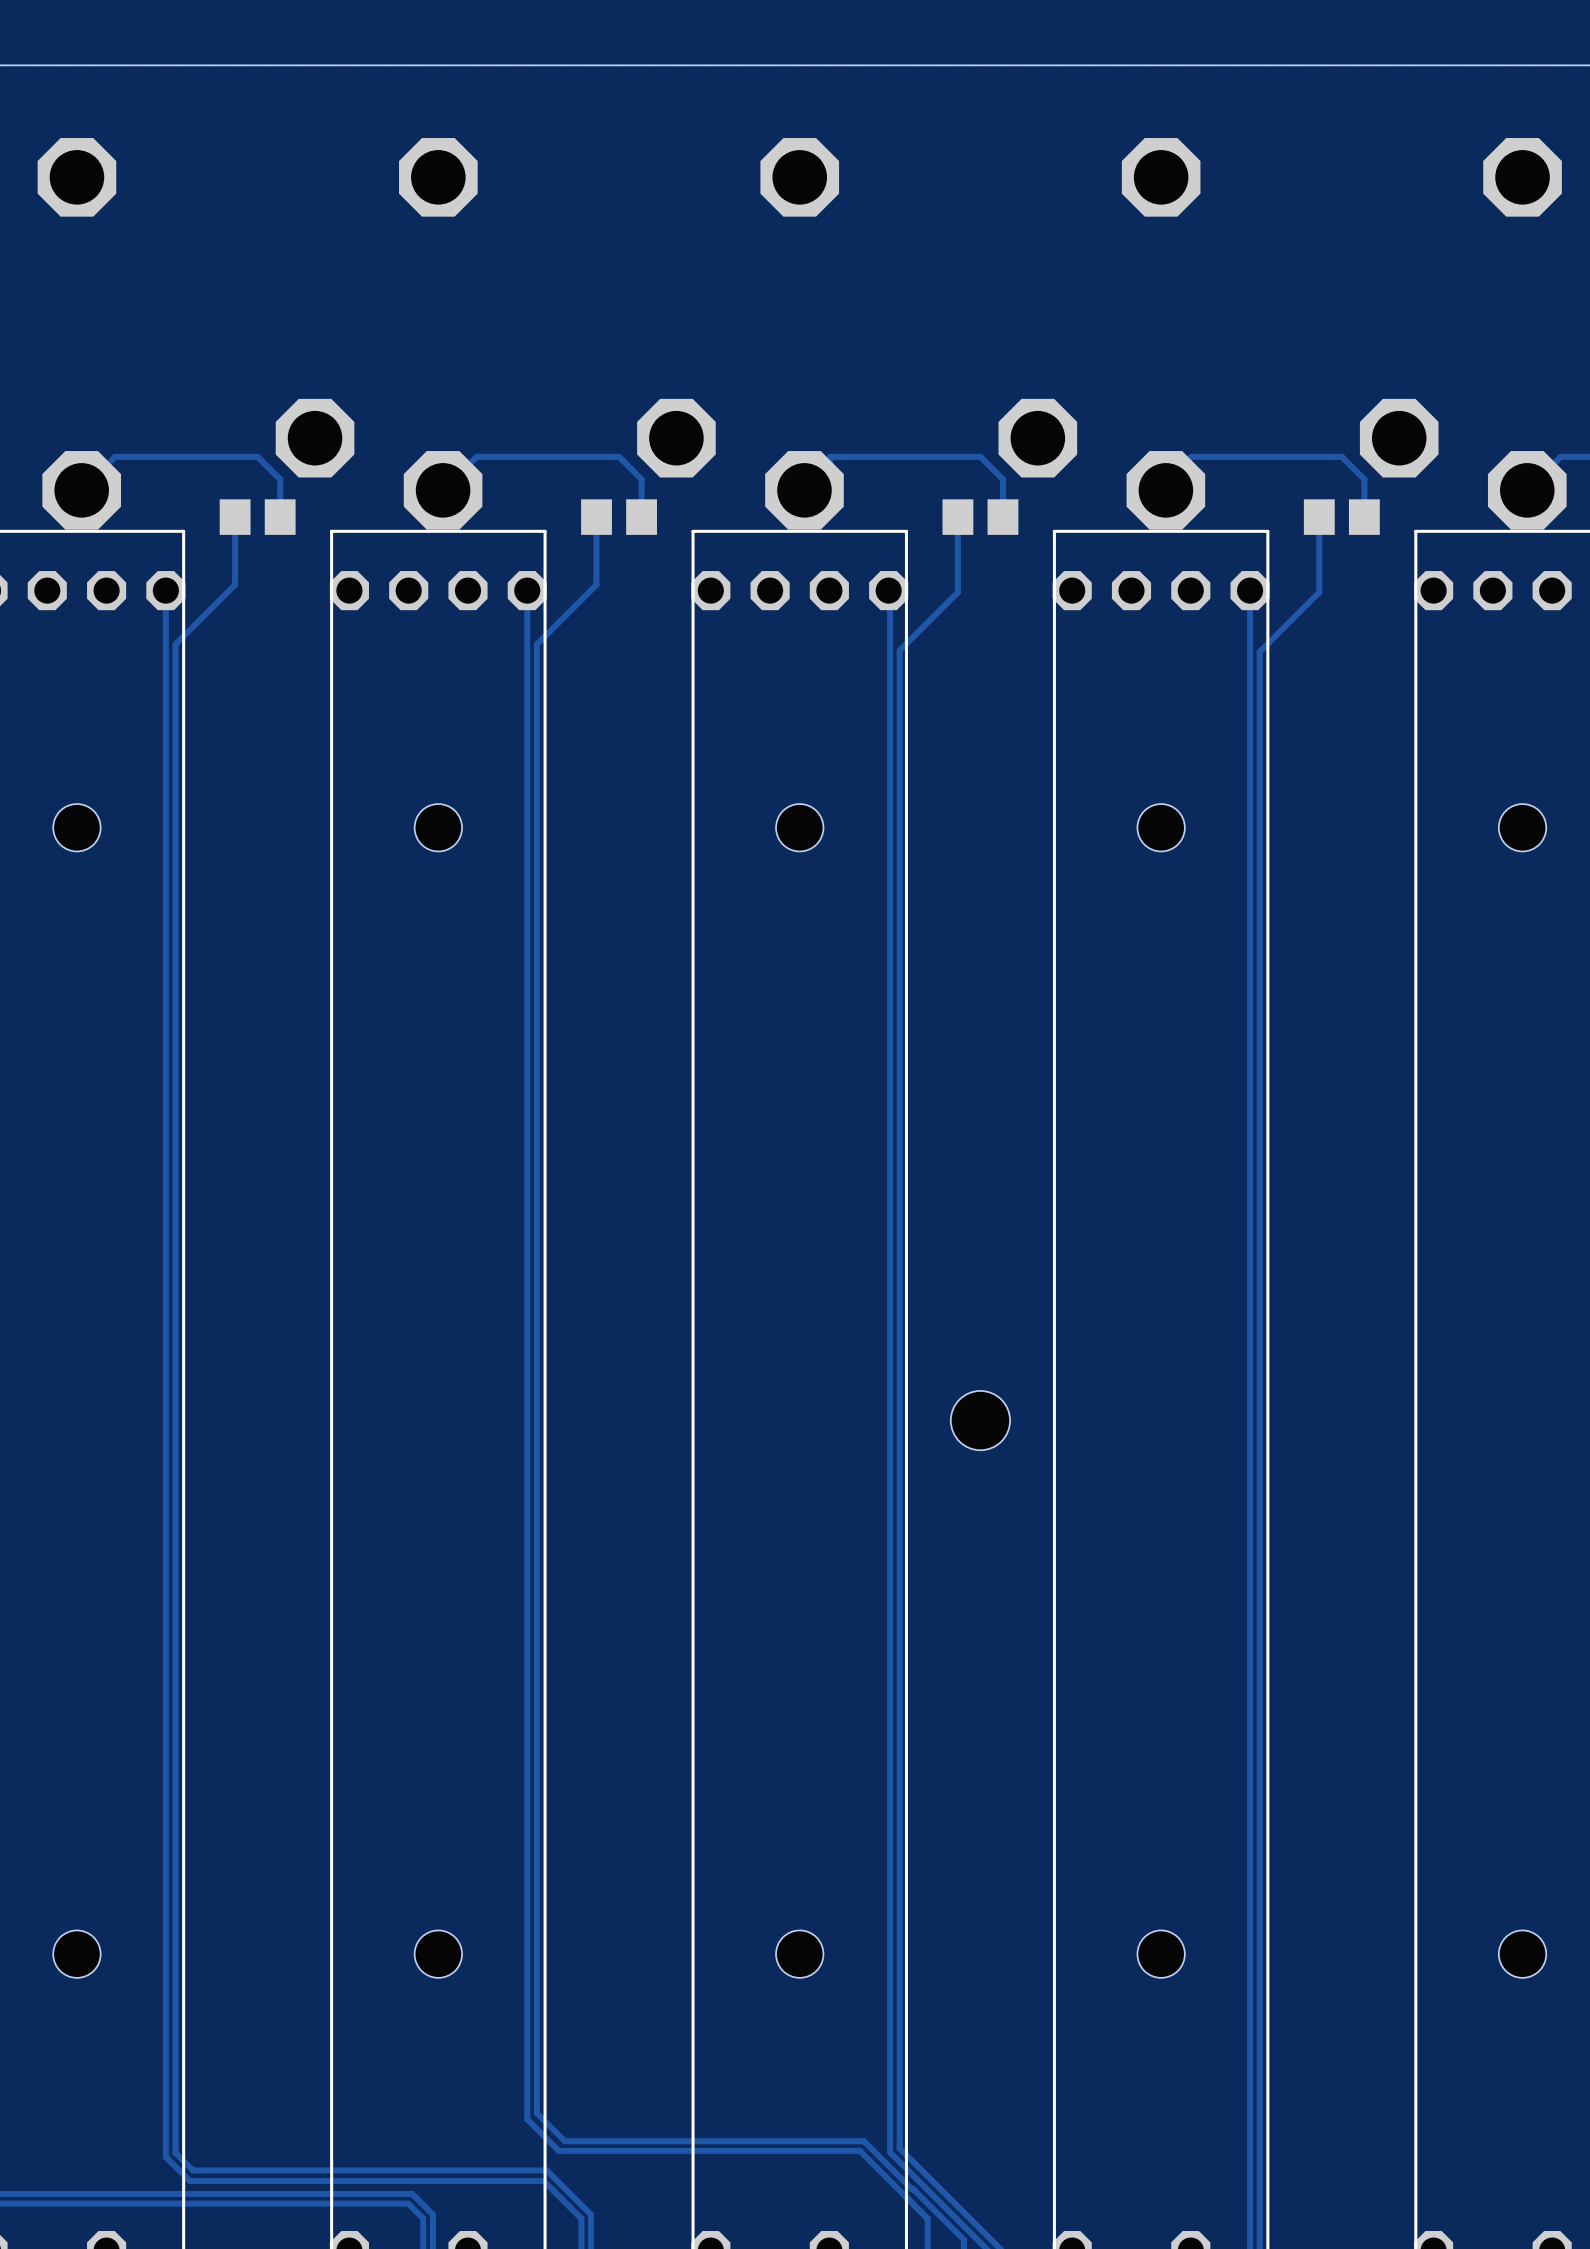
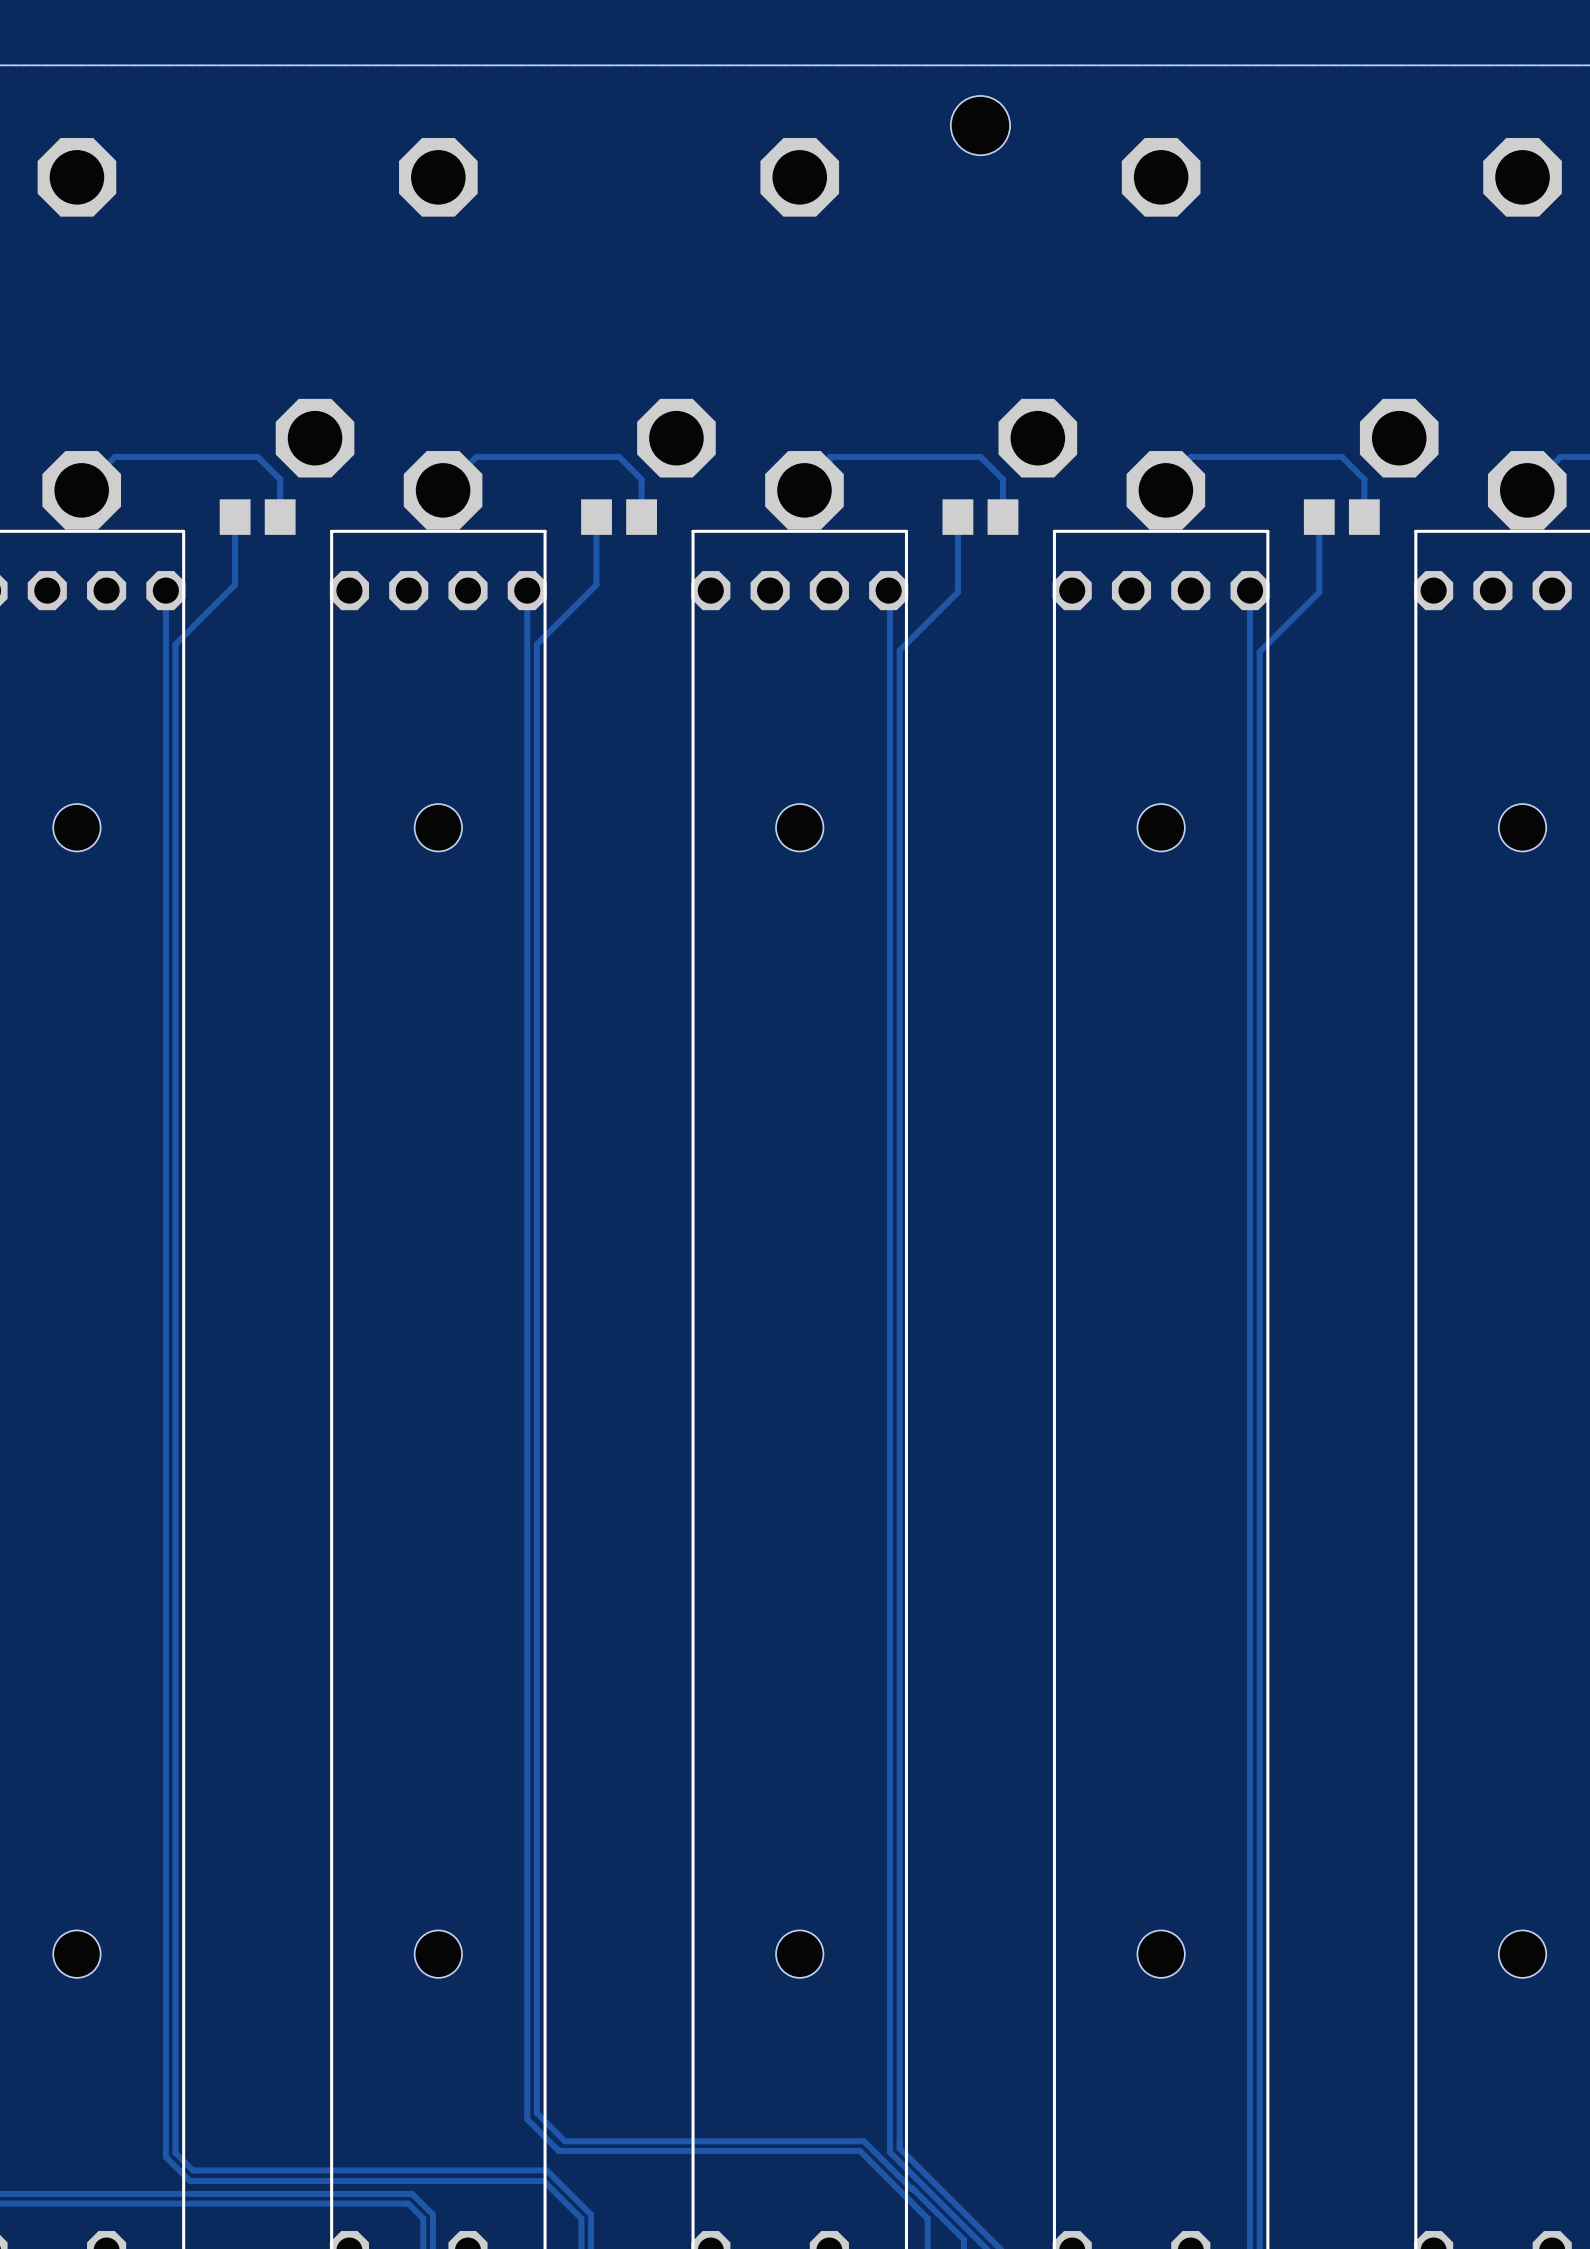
hole: none -> (980, 125)
hole: (980, 1420) -> none

